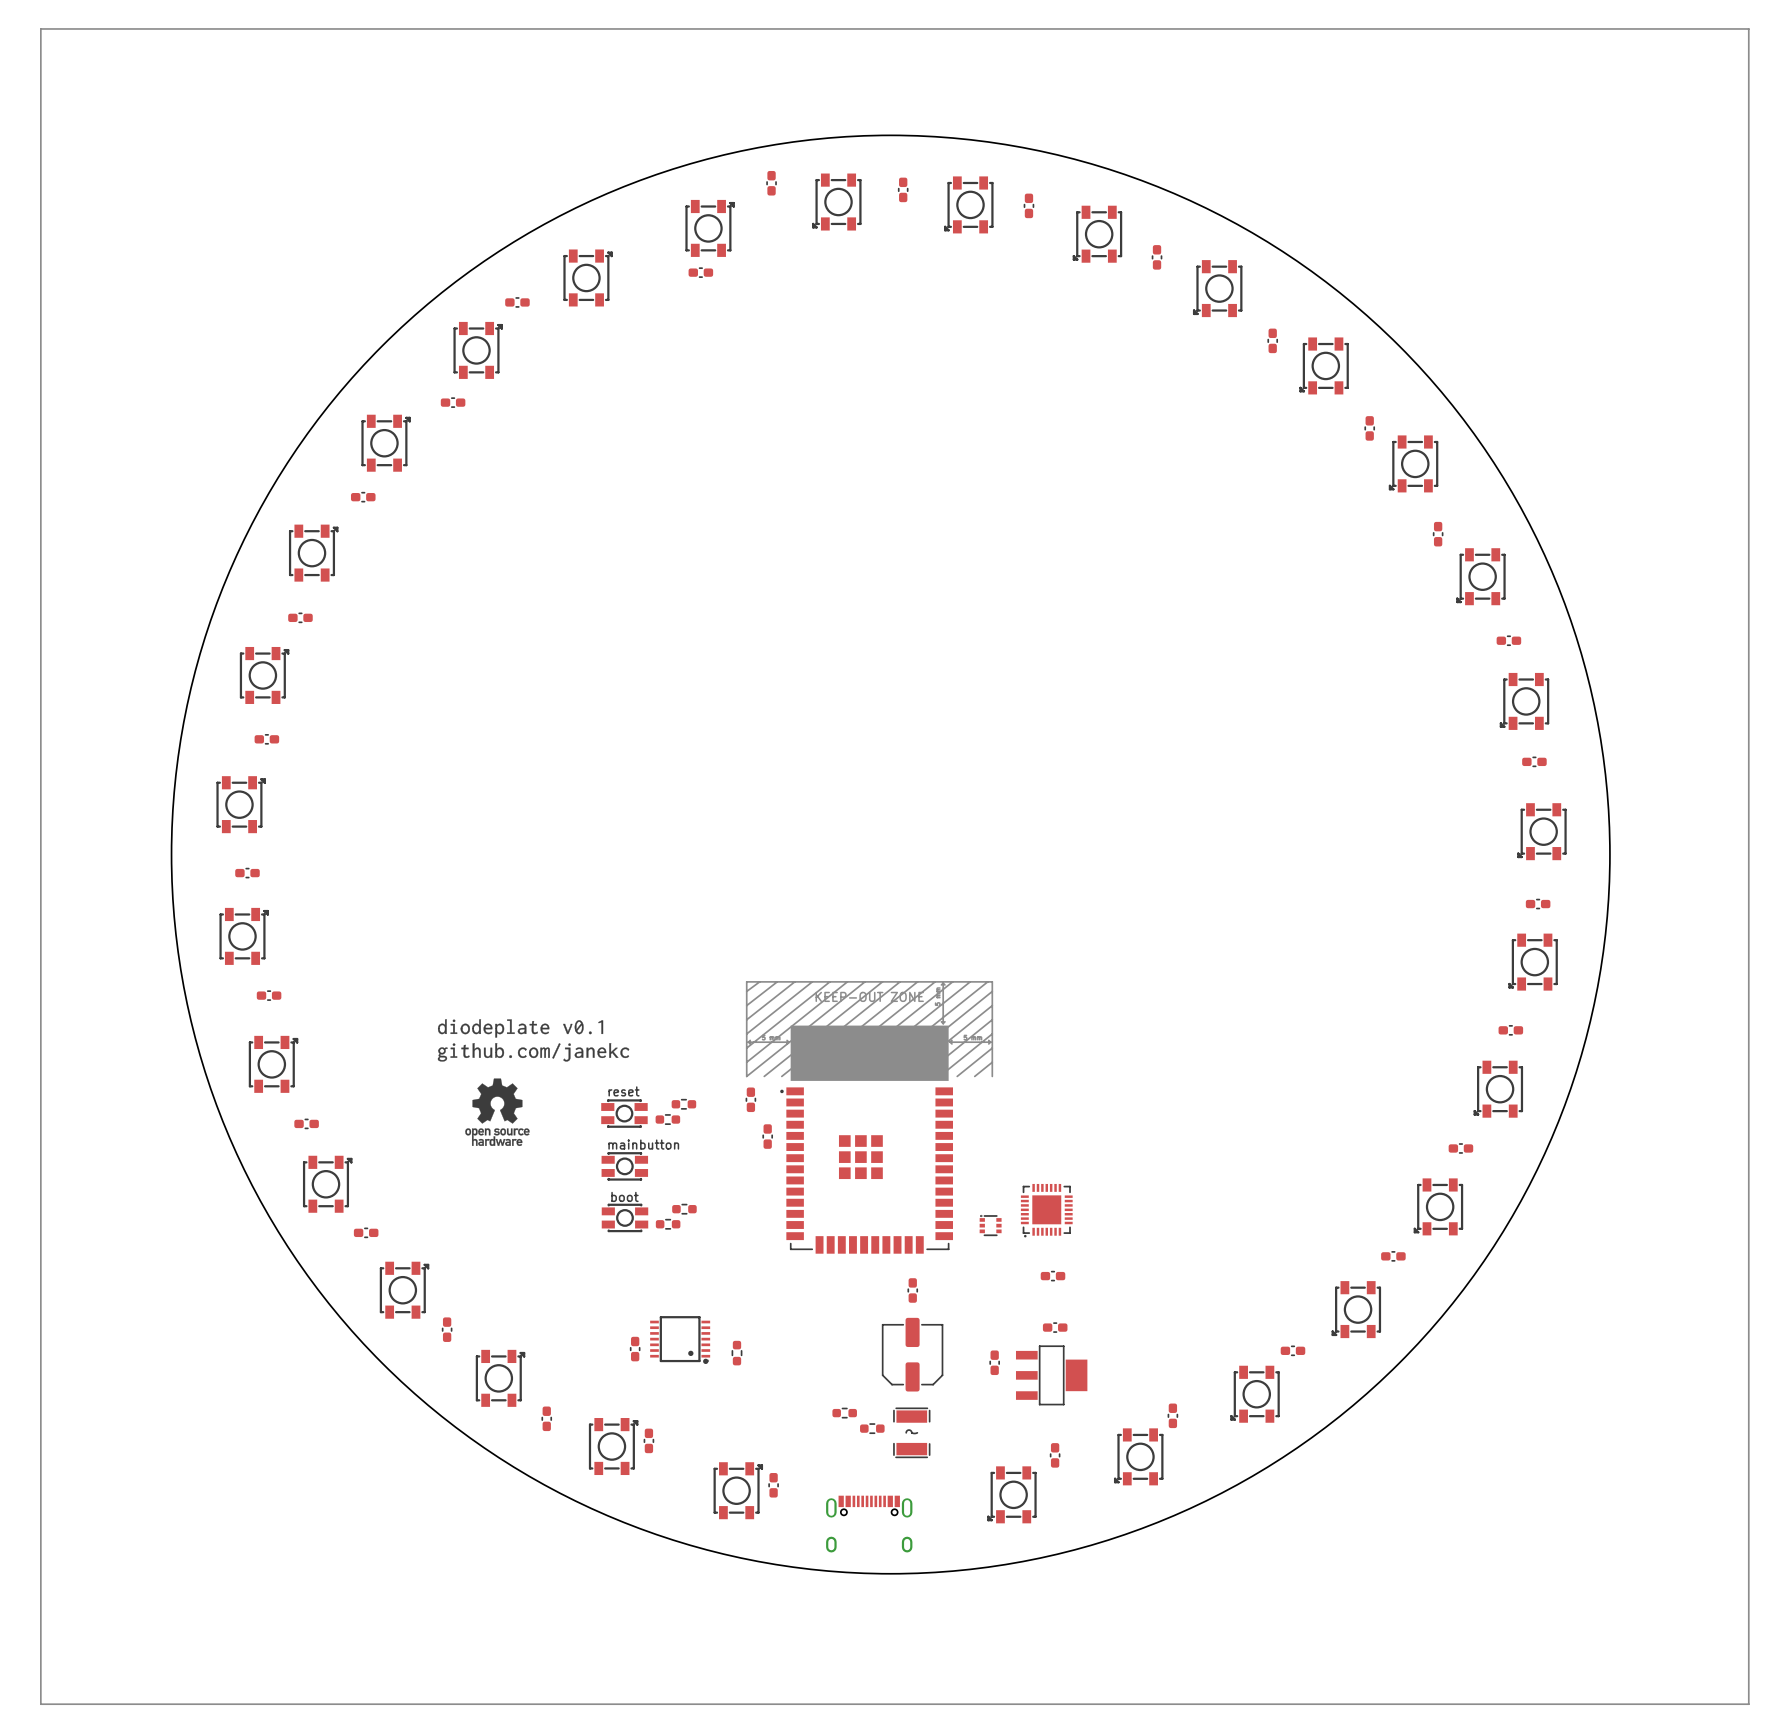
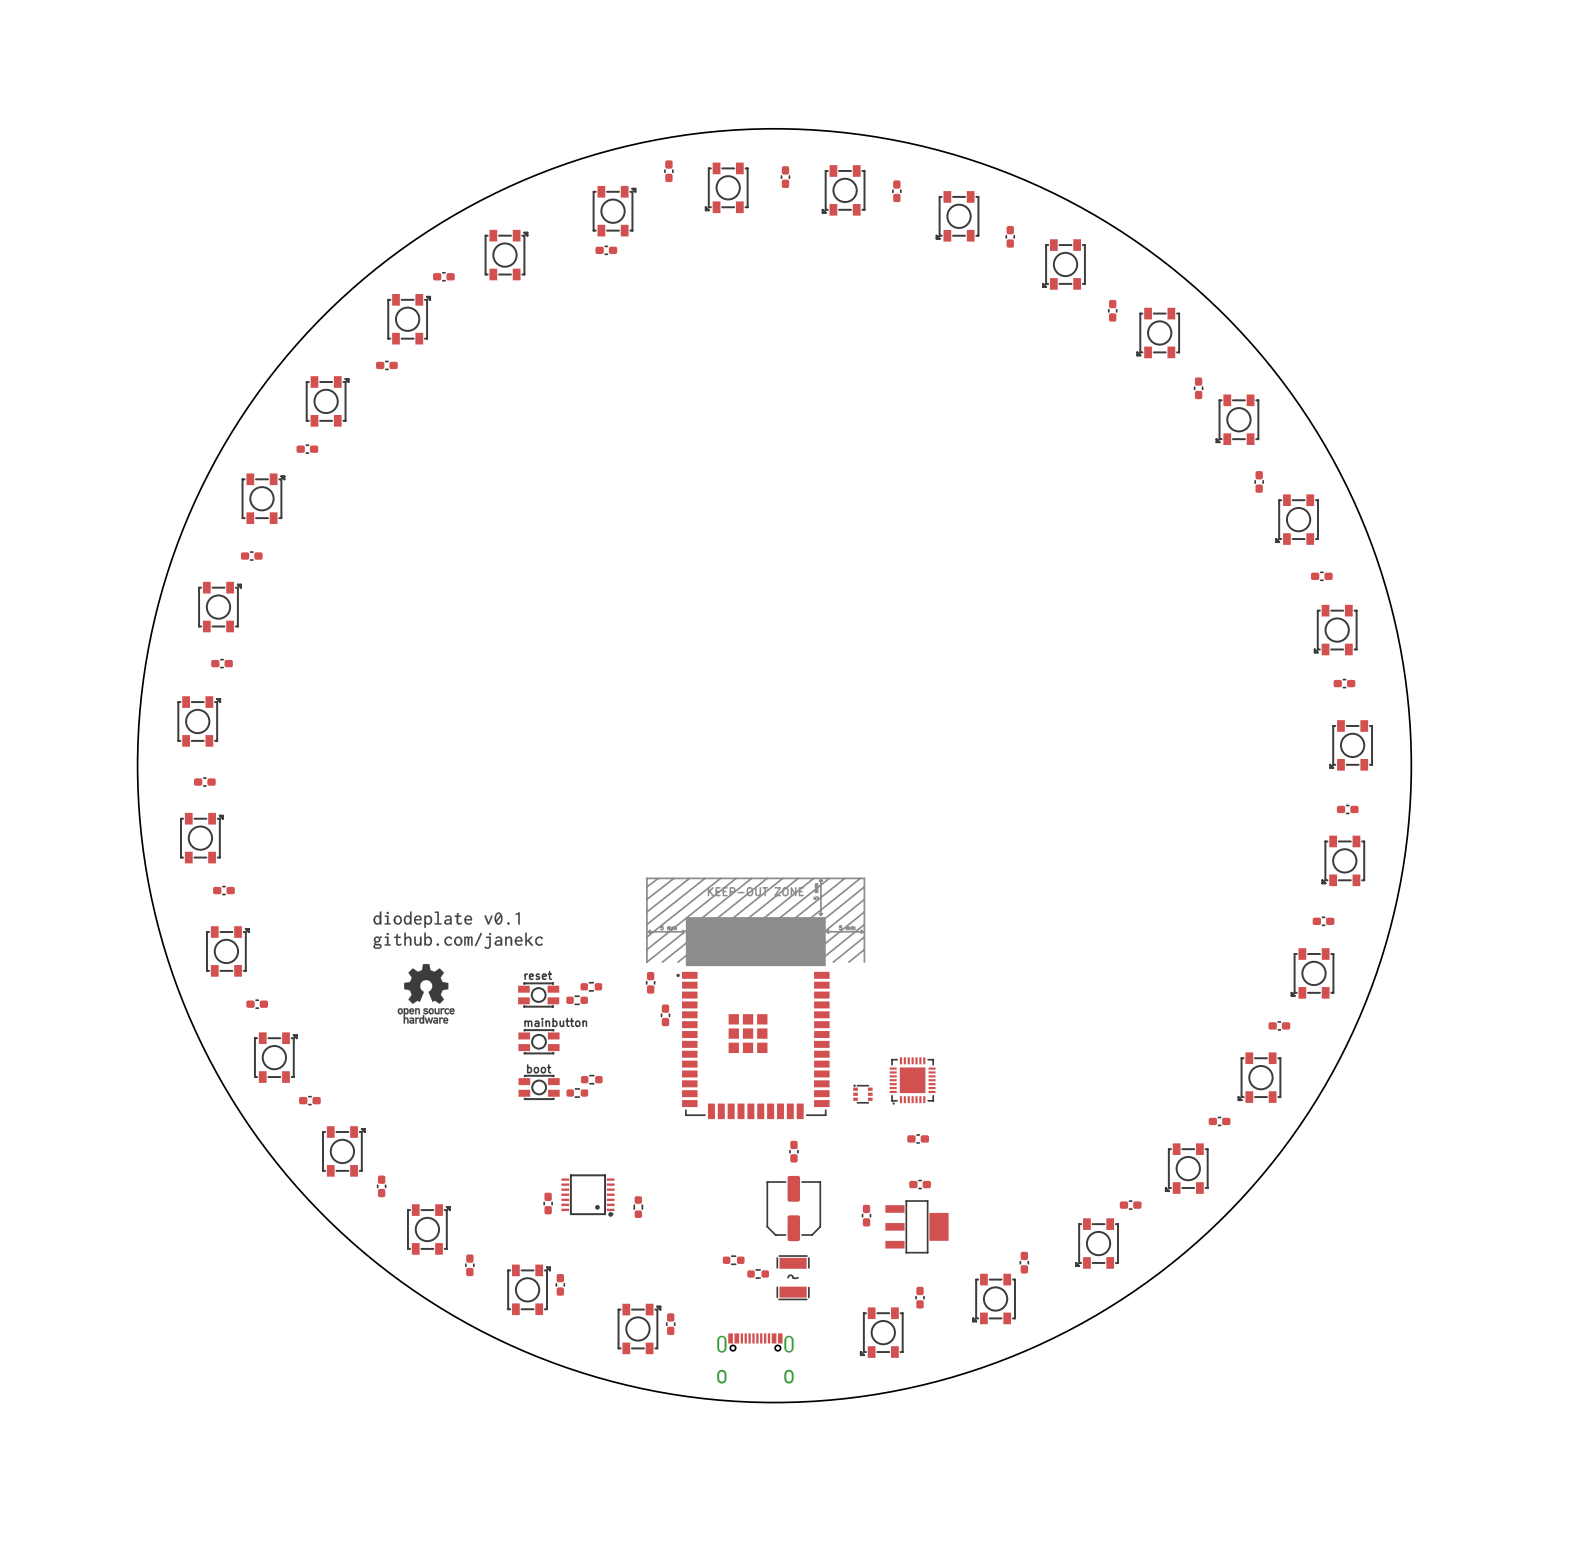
line: (40, 28) (1748, 28) (1748, 1704) (40, 1704) (40, 28) -> none

